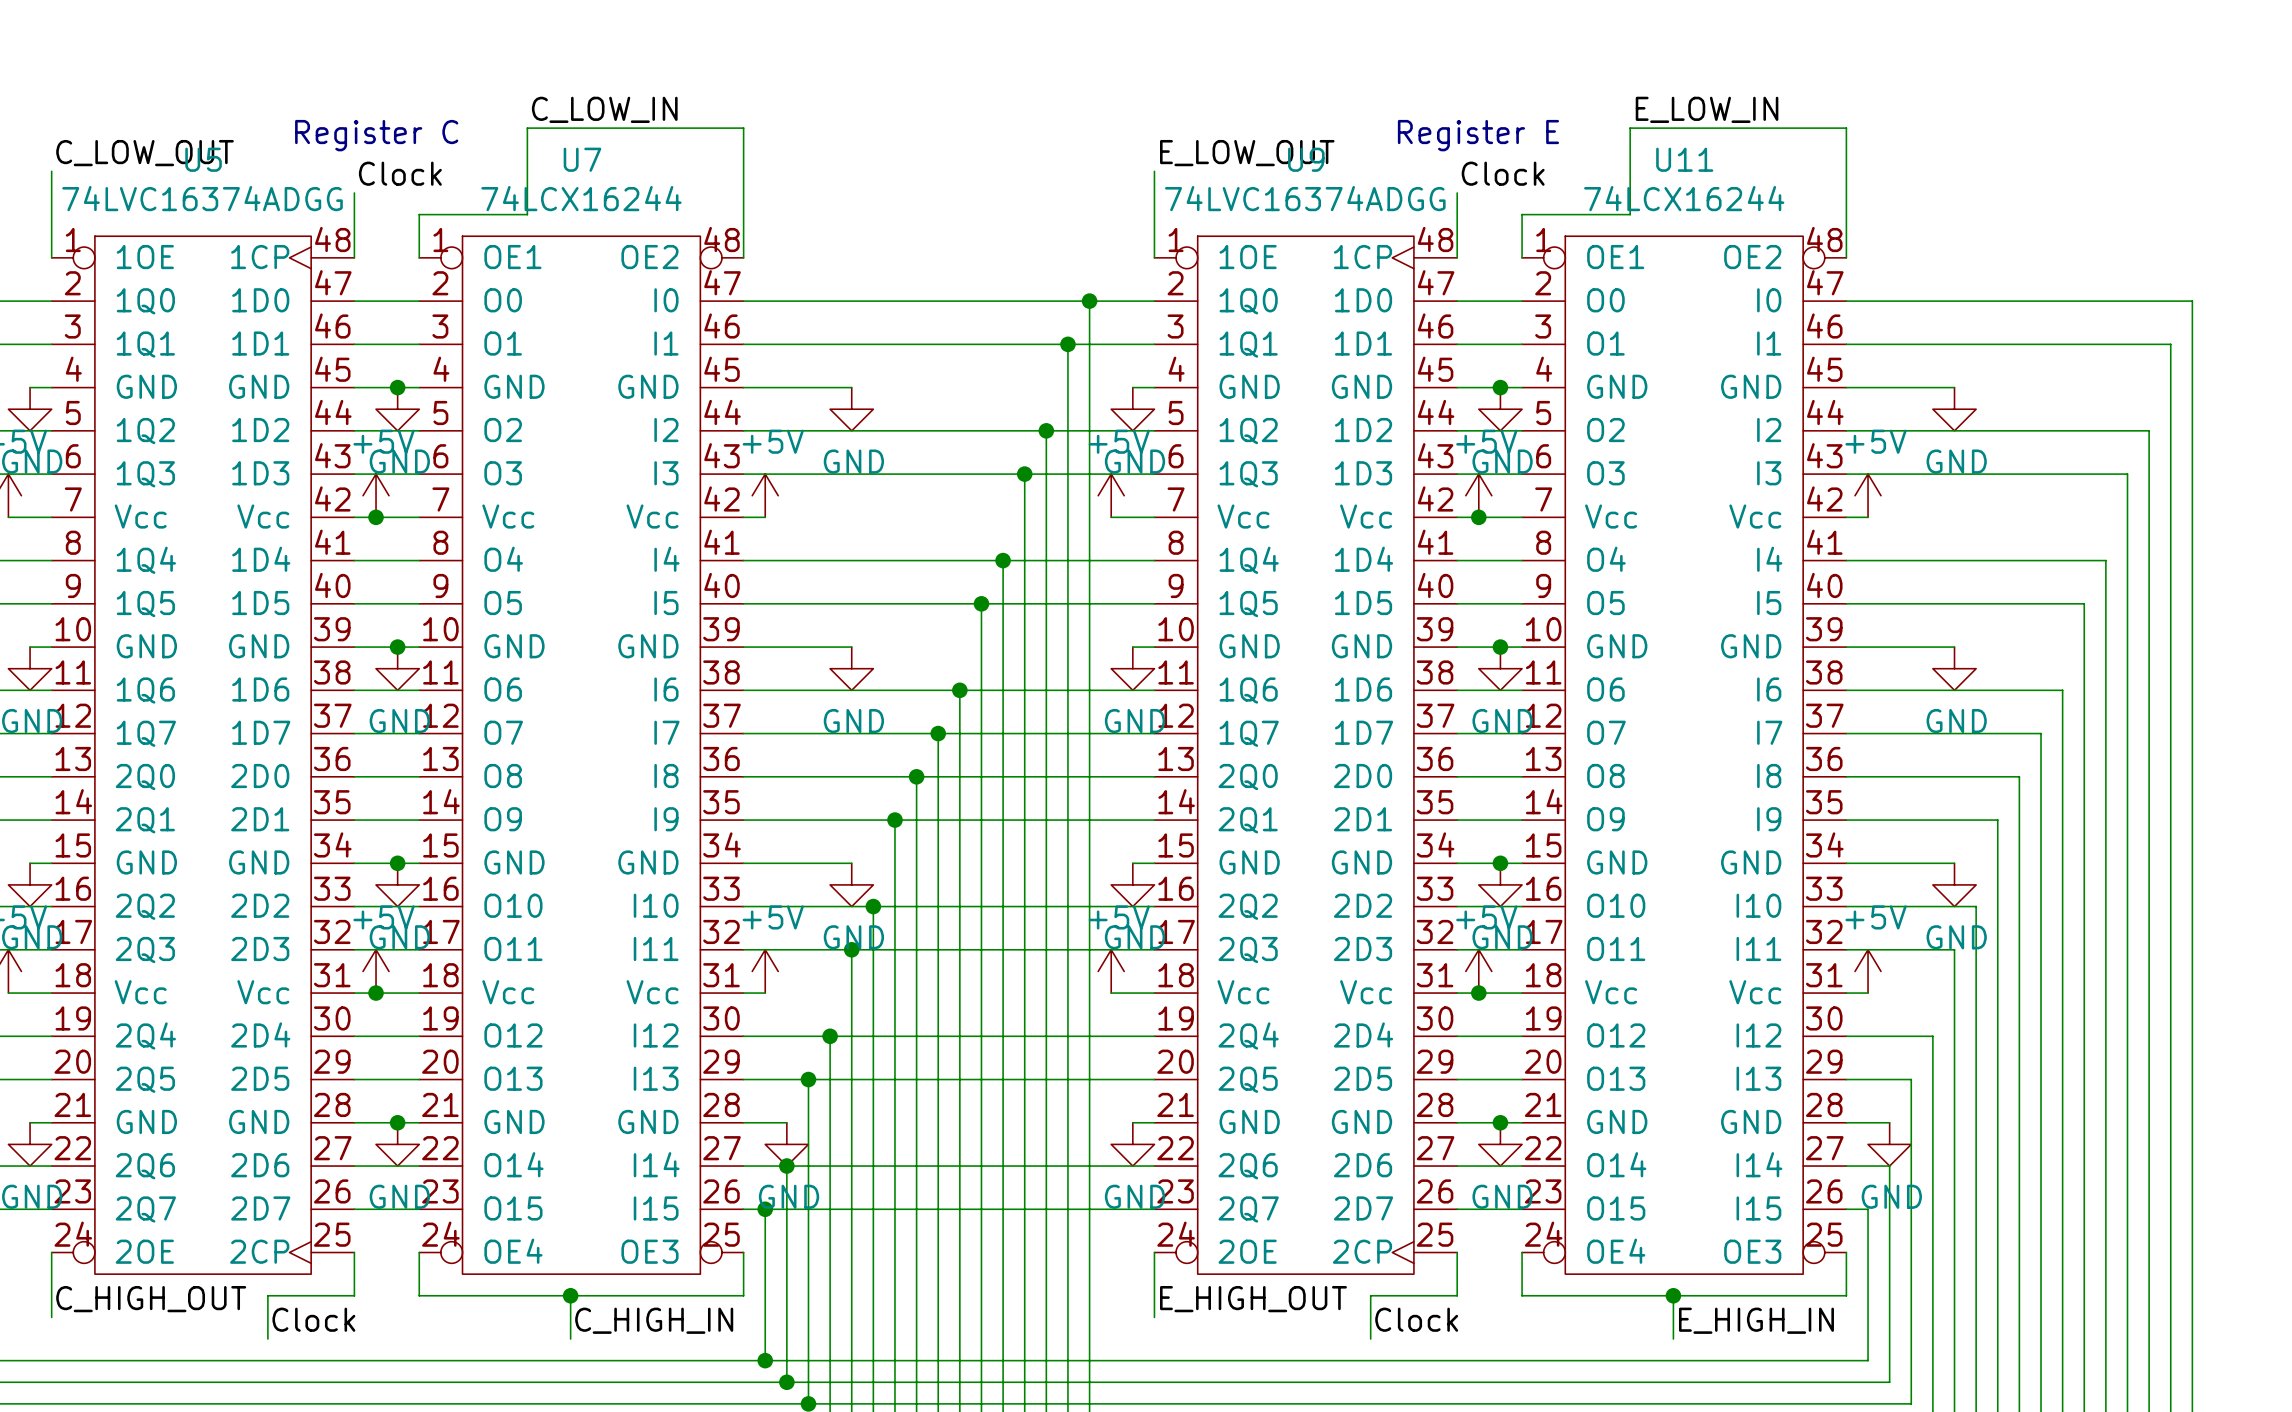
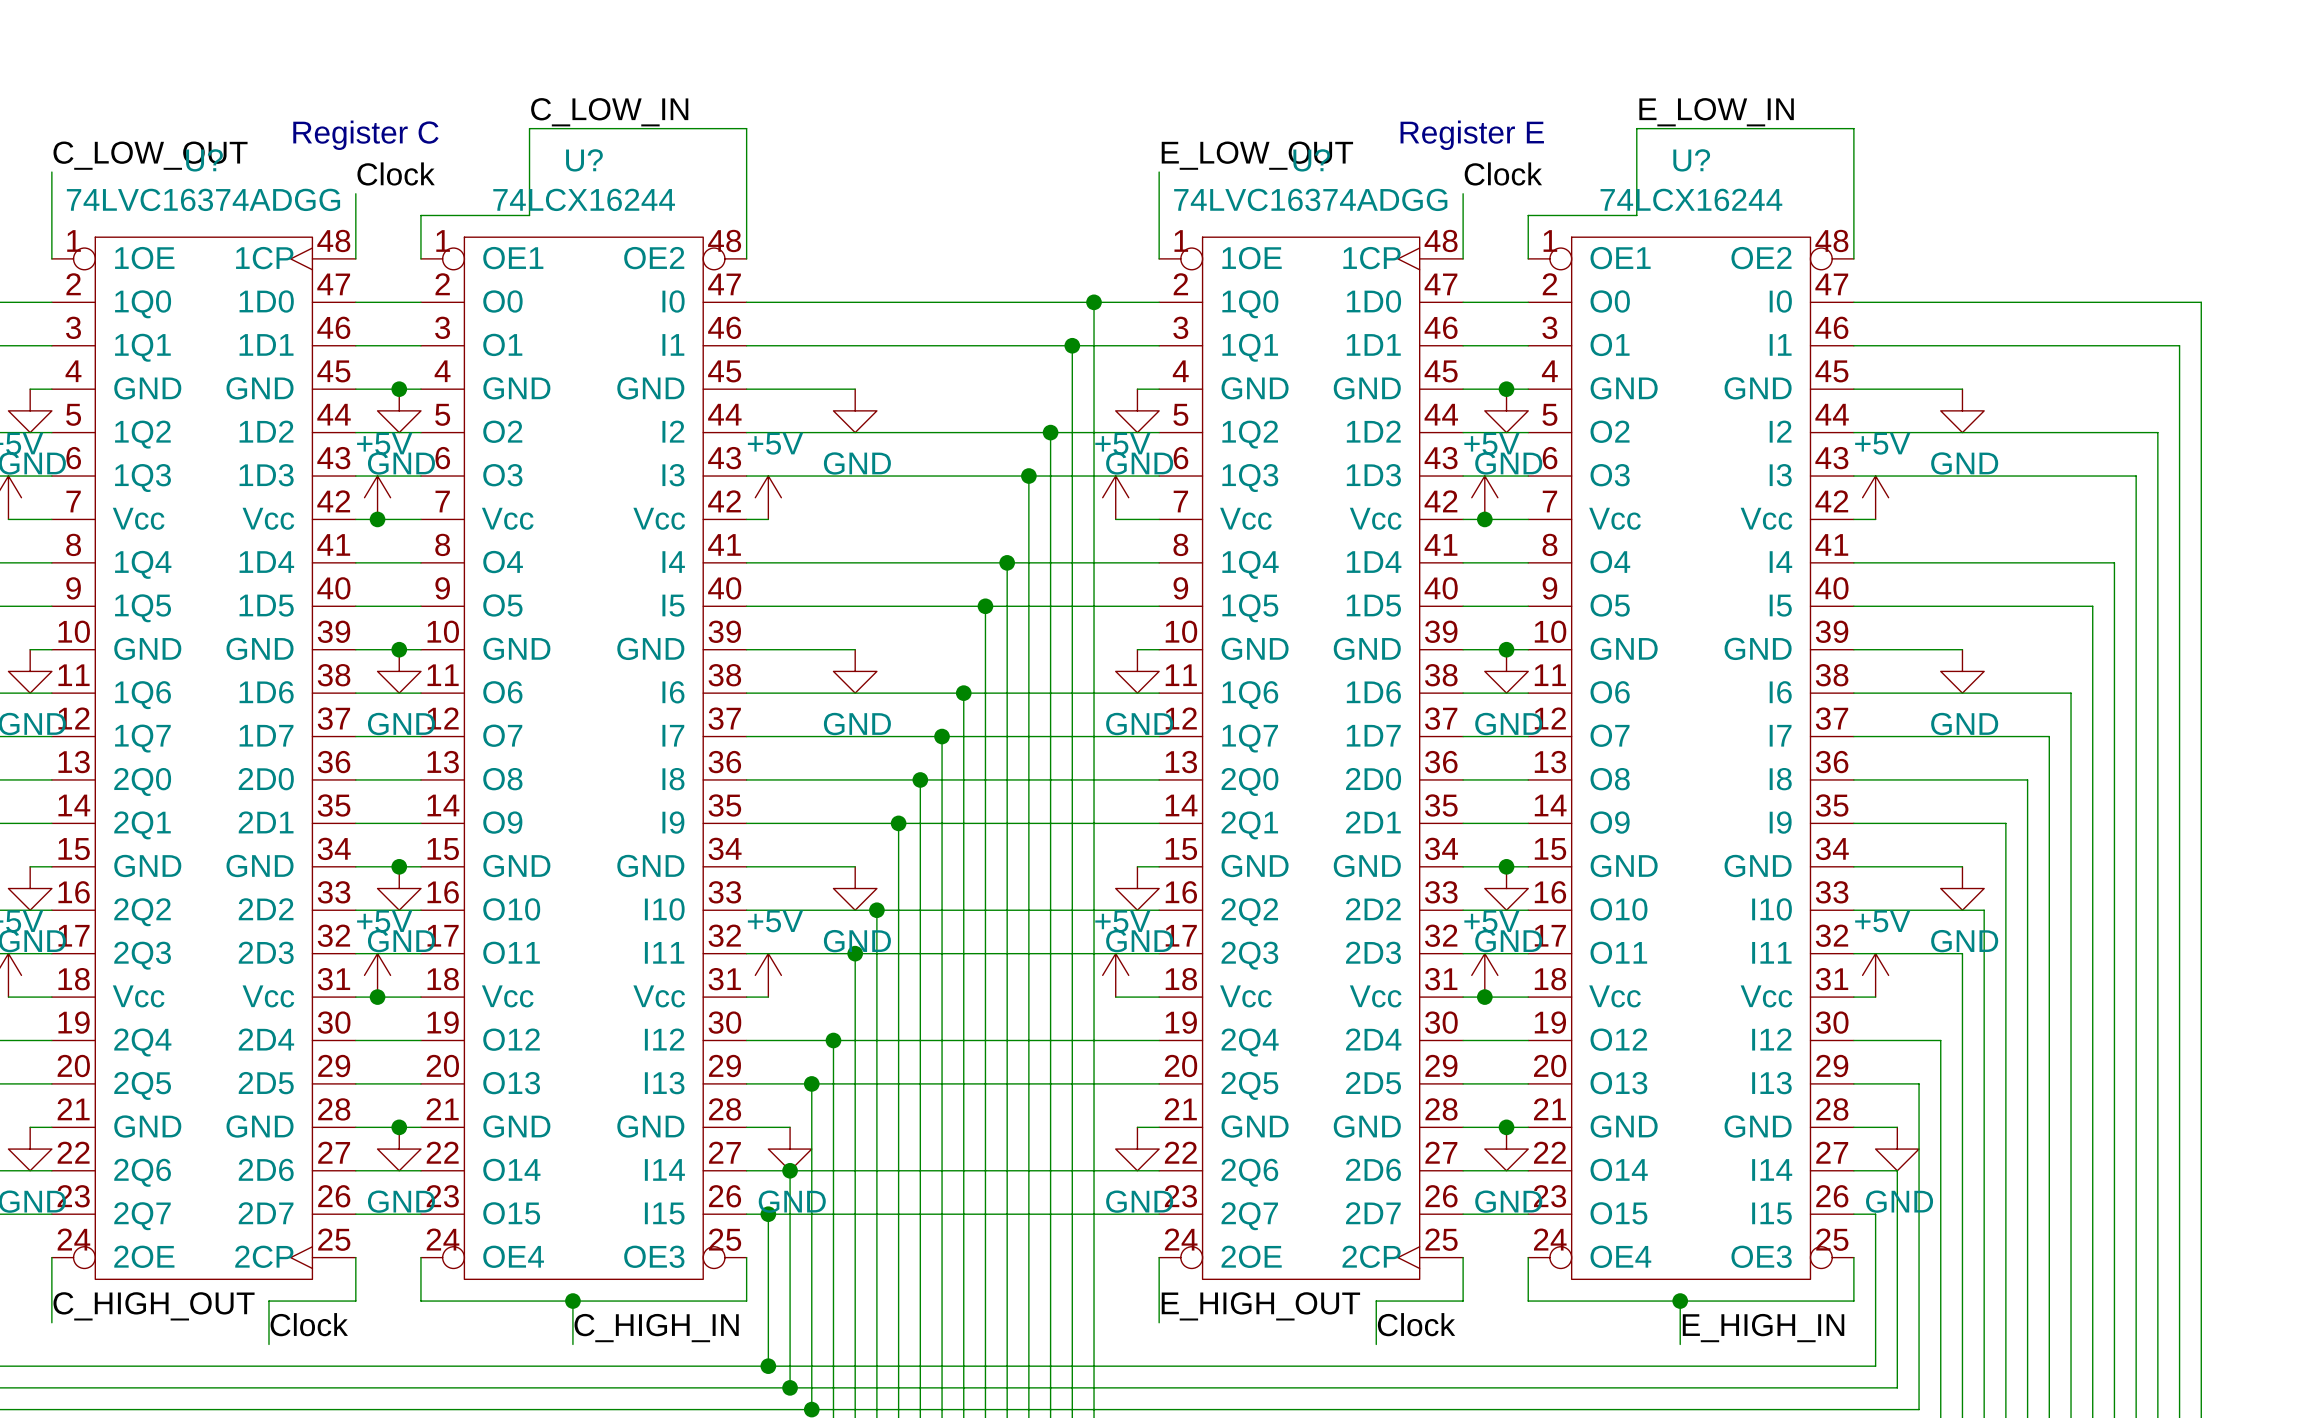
U5 name: U5 (203, 159) -> U? (204, 160)
U7 name: U7 (582, 159) -> U? (584, 160)
U9 name: U9 (1306, 159) -> U? (1311, 160)
U11 name: U11 (1684, 159) -> U? (1691, 160)

